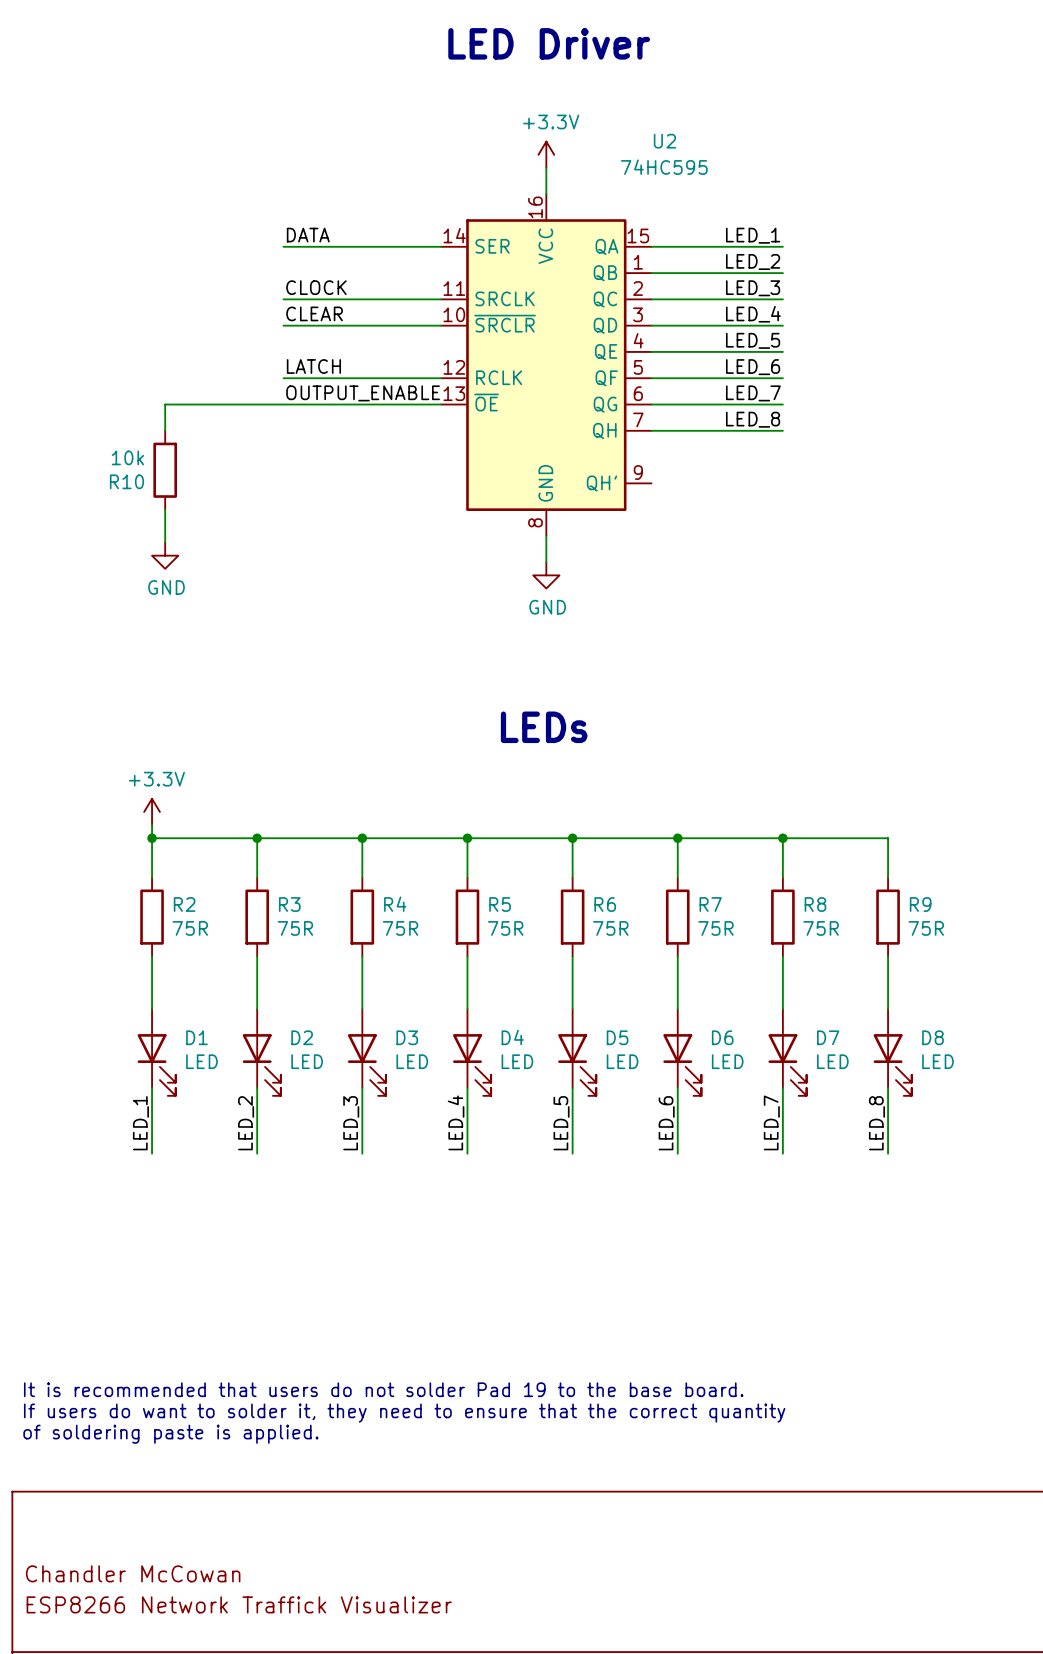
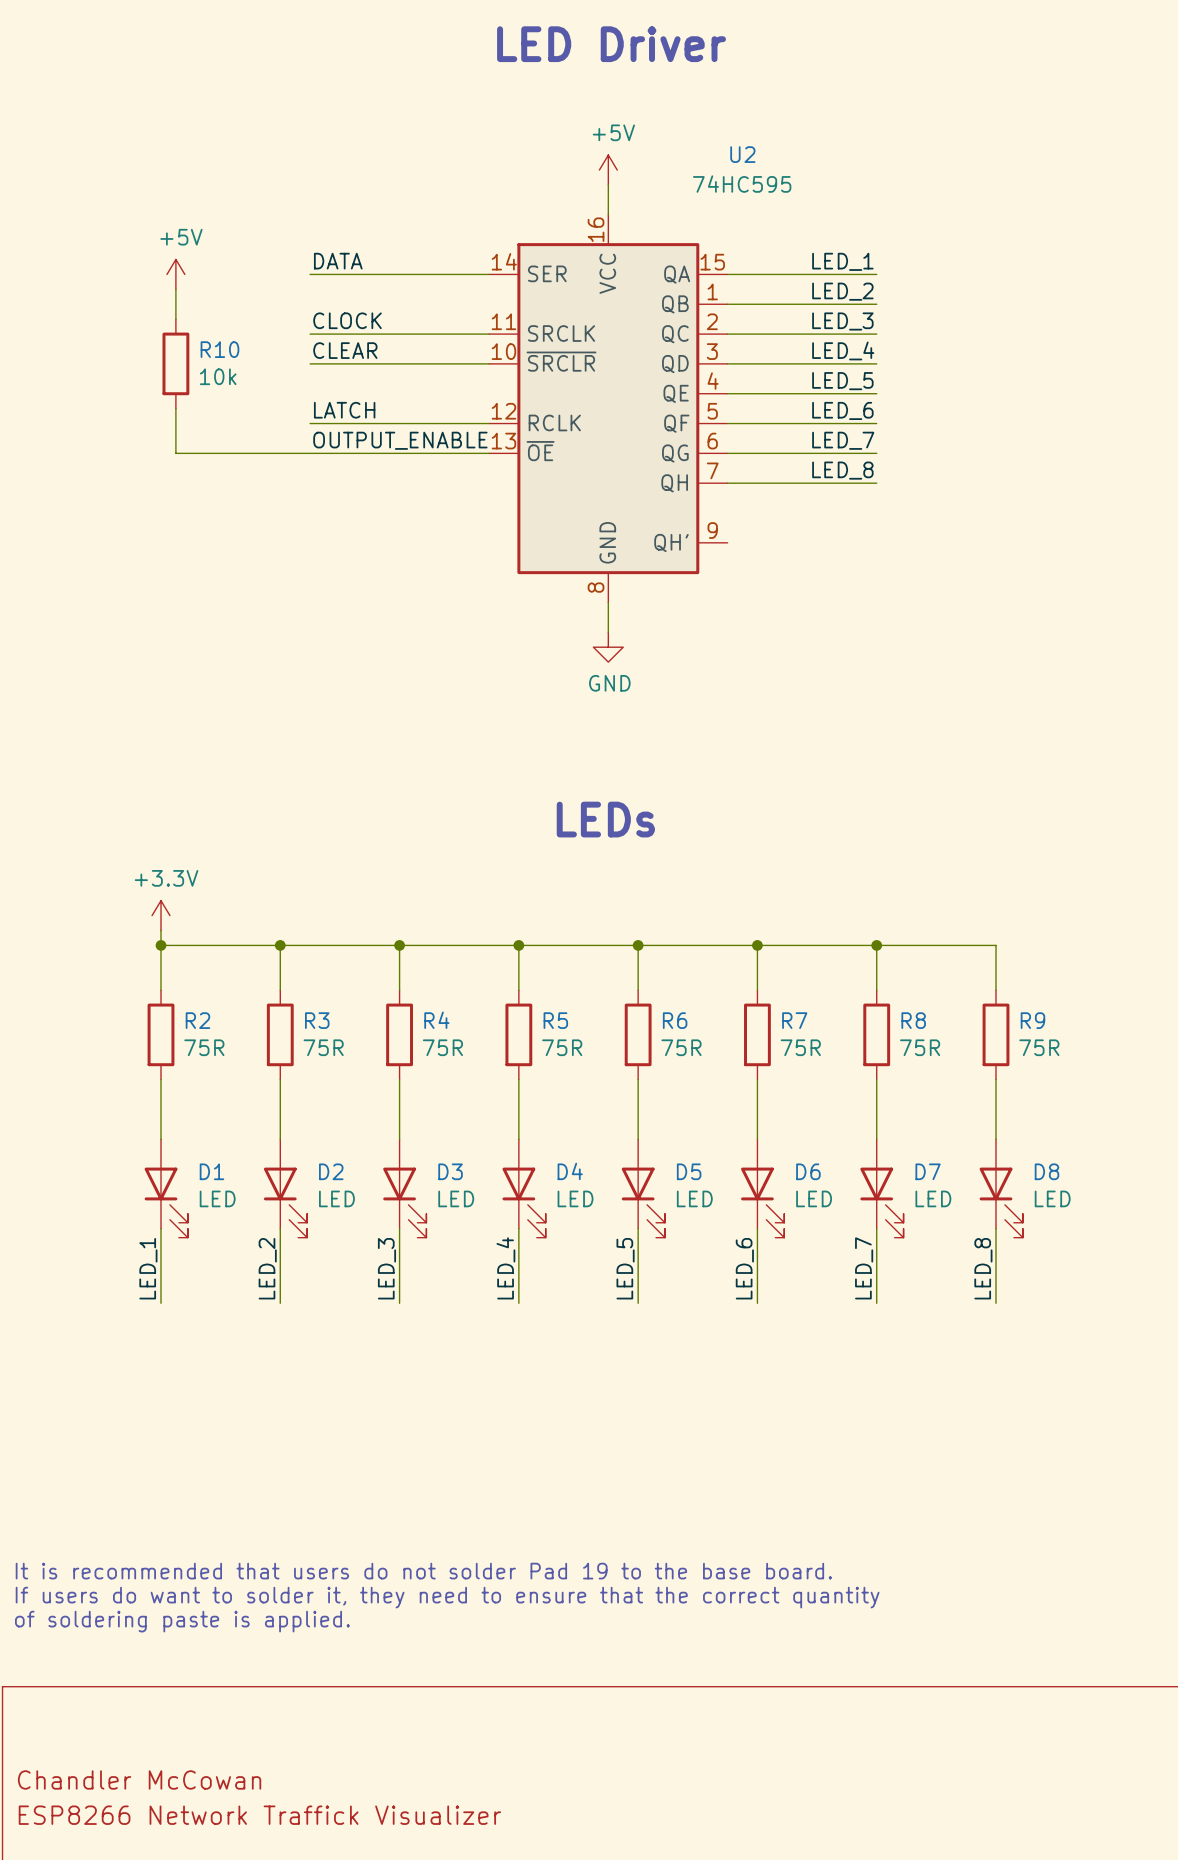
power symbol: +3.3V (546, 154) -> +5V (608, 170)
power symbol: none -> +5V (175, 274)
wire: none -> (175, 289) (175, 319)
wire: (165, 404) (165, 430) -> (175, 453) (175, 408)
R10 value position: 10k (127, 457) -> 10k (218, 376)
R10 position: (165, 470) -> (175, 363)
R10 name position: R10 (126, 481) -> R10 (219, 349)
wire: (165, 509) (165, 542) -> none
power symbol: GND (165, 555) -> none

